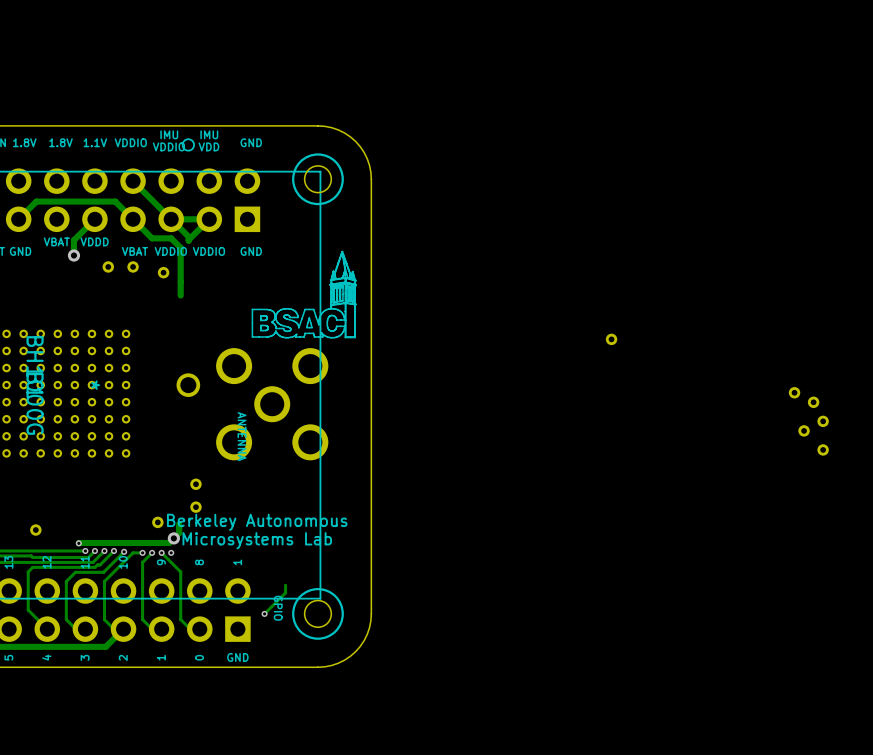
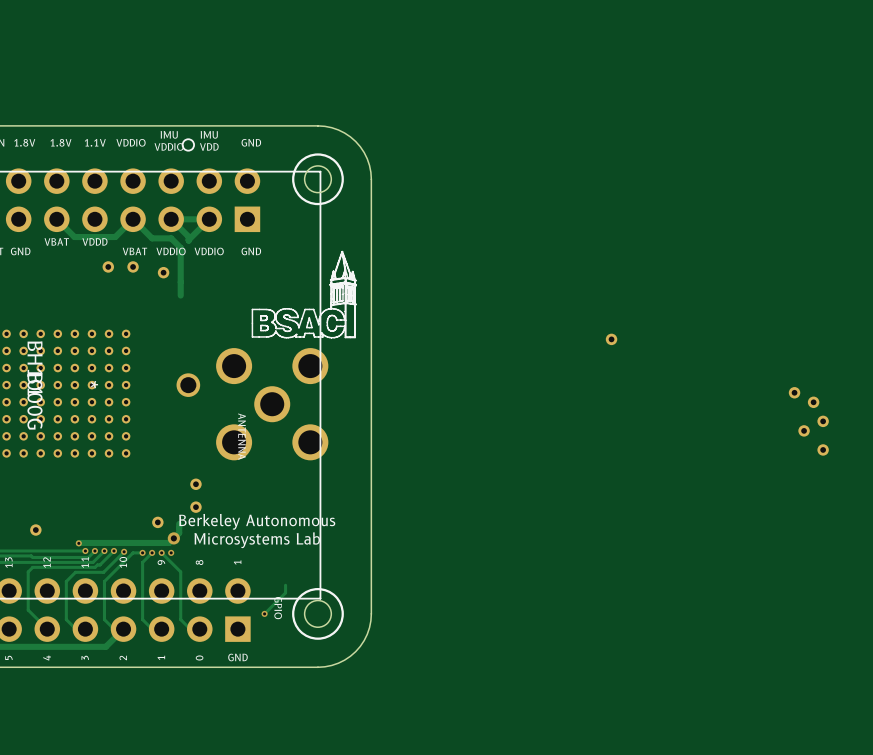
track: (133, 181) (171, 219) -> none
track: (94, 219) (73, 240) (73, 255) -> none
track: (133, 219) (115, 201) (36, 201) (18, 219) -> (133, 219) (115, 237) (74, 237) (56, 219)
via: (73, 255) -> none

